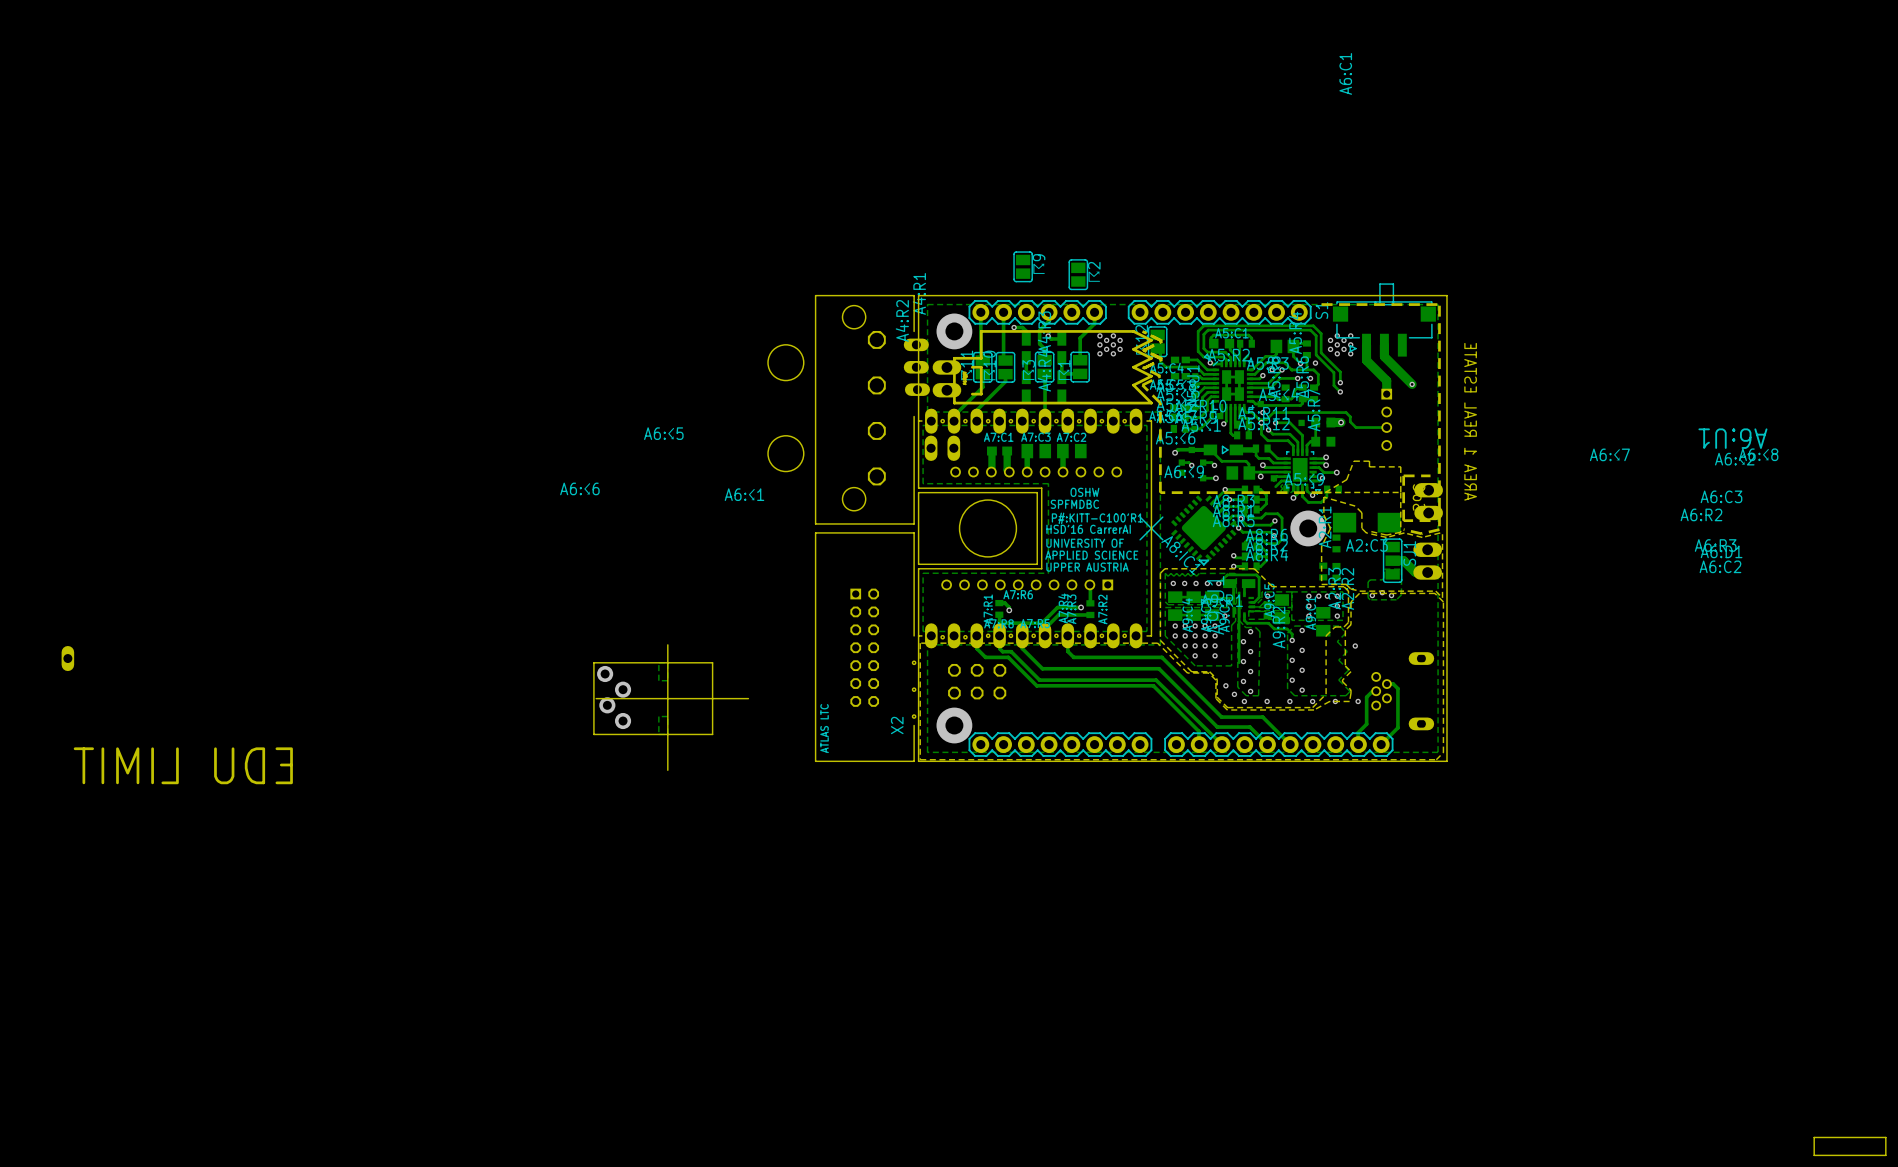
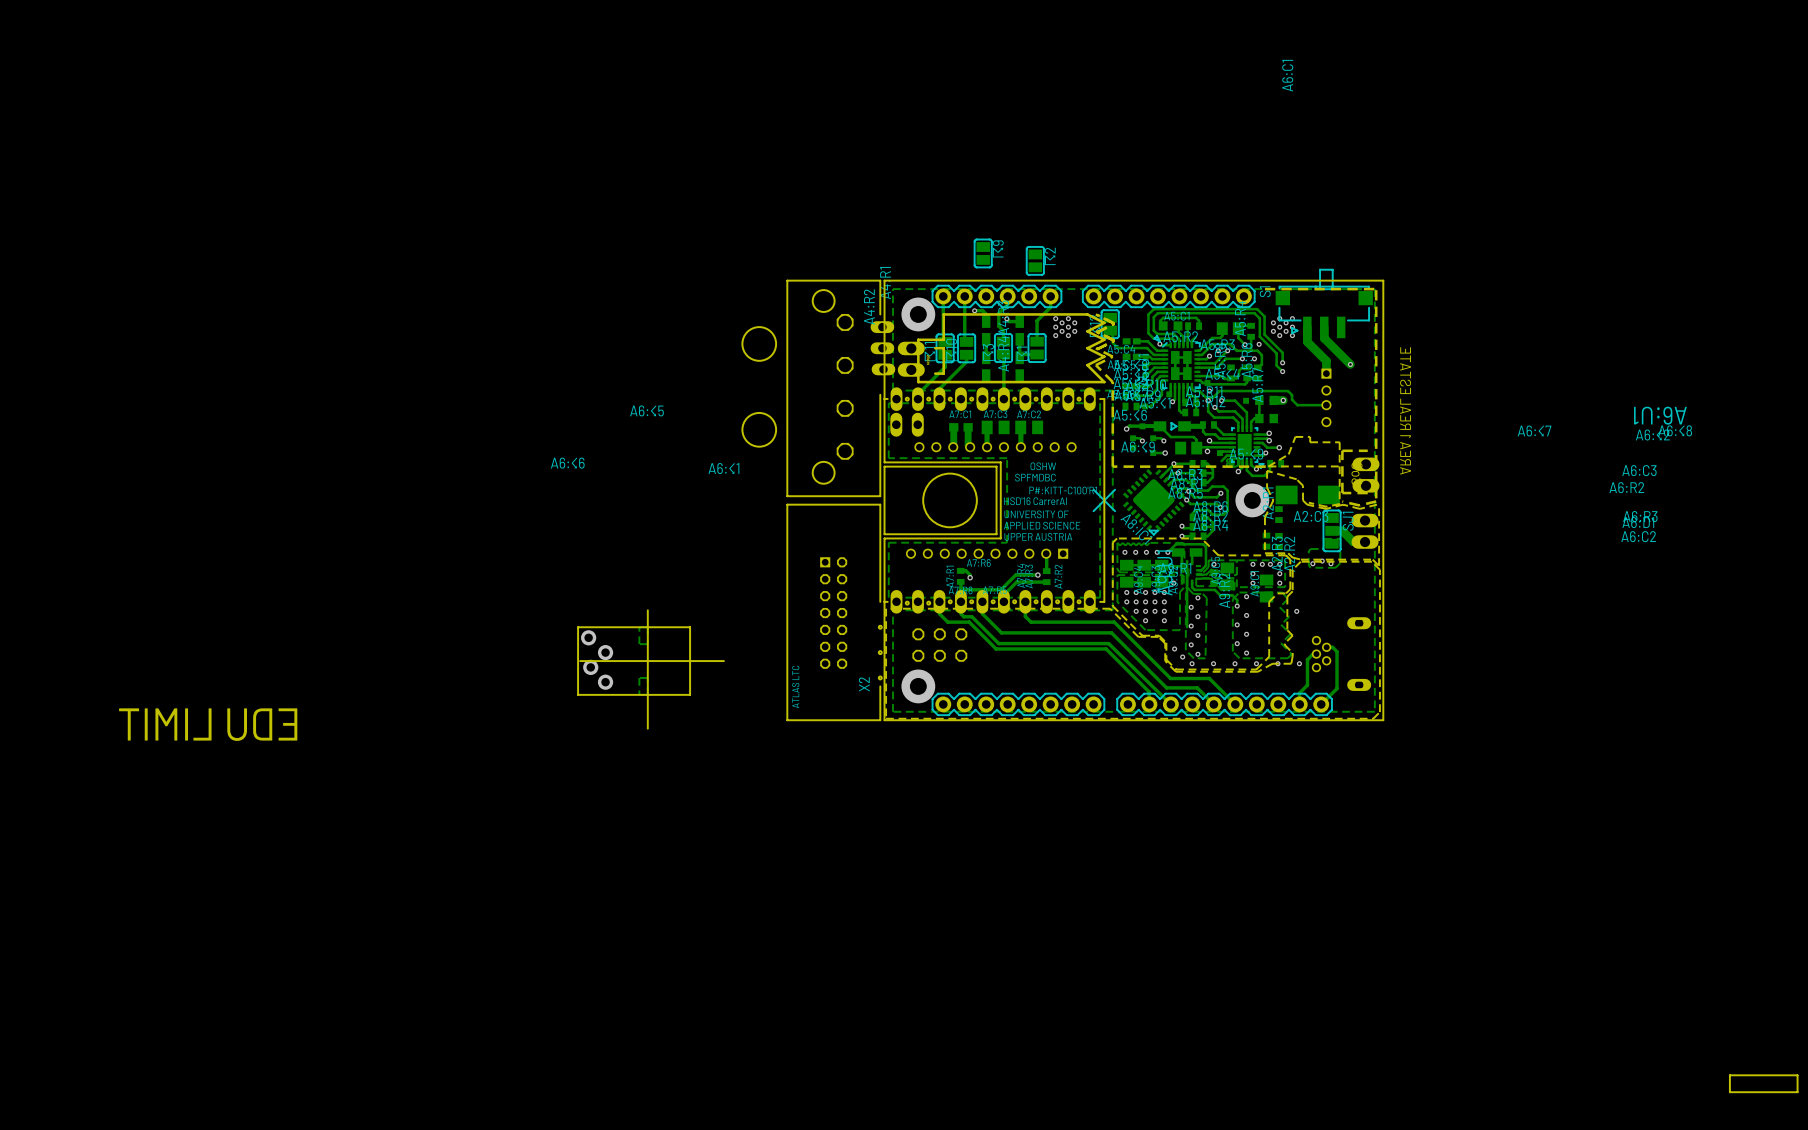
part: (67, 658) -> none

